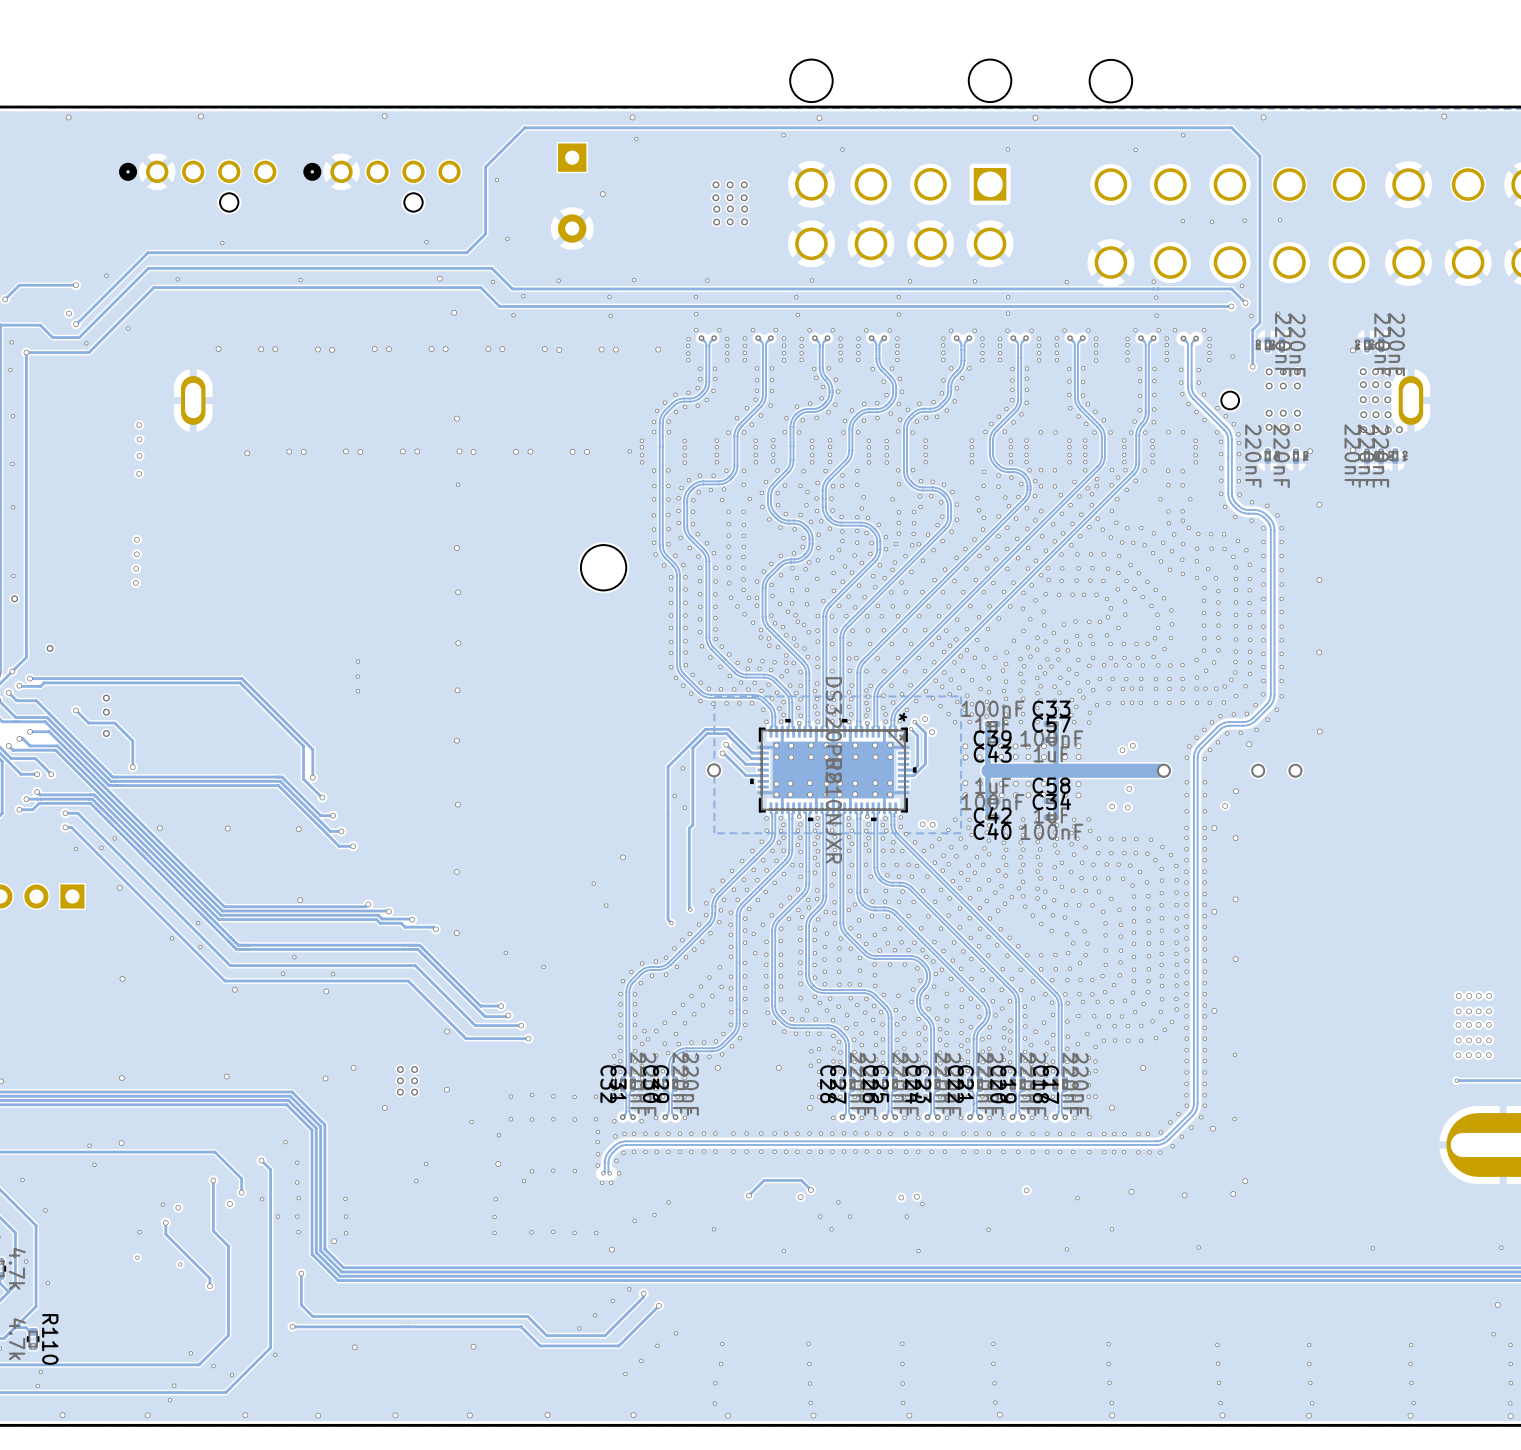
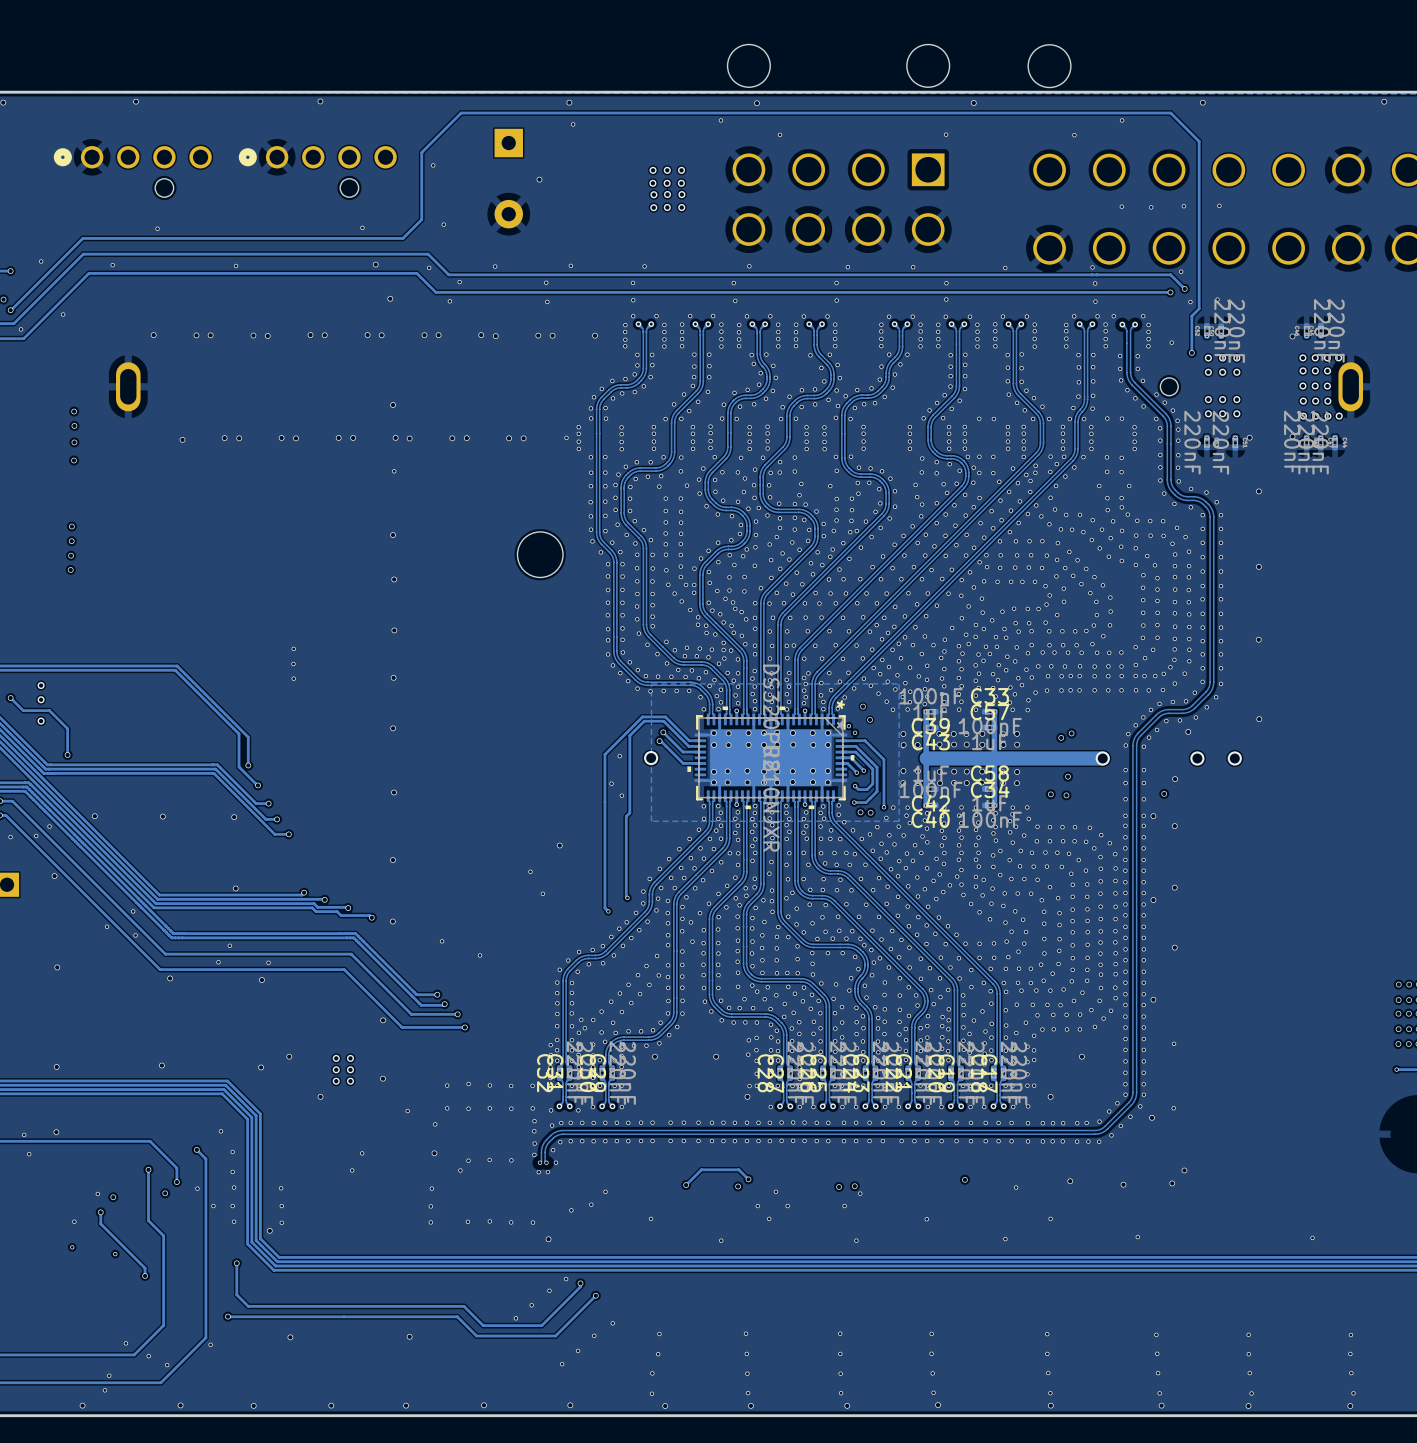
via: (721, 646) -> none
track: (914, 722) (925, 732) (925, 764) (913, 775) (909, 775) -> (856, 772) (847, 763)
via: (914, 722) -> none
track: (911, 729) (917, 735) (917, 765) (913, 770) -> (863, 770) (851, 757)
via: (911, 729) -> none
via: none -> (848, 726)
via: none -> (855, 732)
track: none -> (841, 740) (865, 740) (883, 759) (883, 807)
track: none -> (841, 746) (856, 746) (877, 767) (877, 791) (866, 802) (854, 802)
track: none -> (841, 752) (855, 752) (872, 769) (872, 783) (867, 789) (858, 789) (855, 786)
via: none -> (863, 770)
via: none -> (856, 772)
via: none -> (855, 786)
via: none -> (854, 802)
via: none -> (883, 807)

